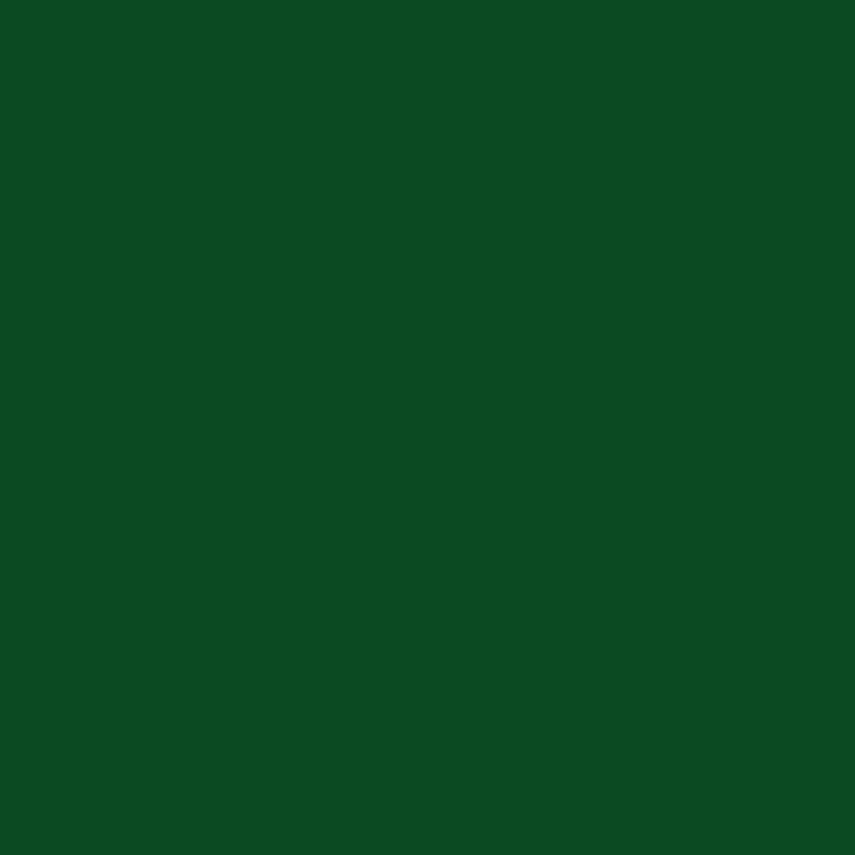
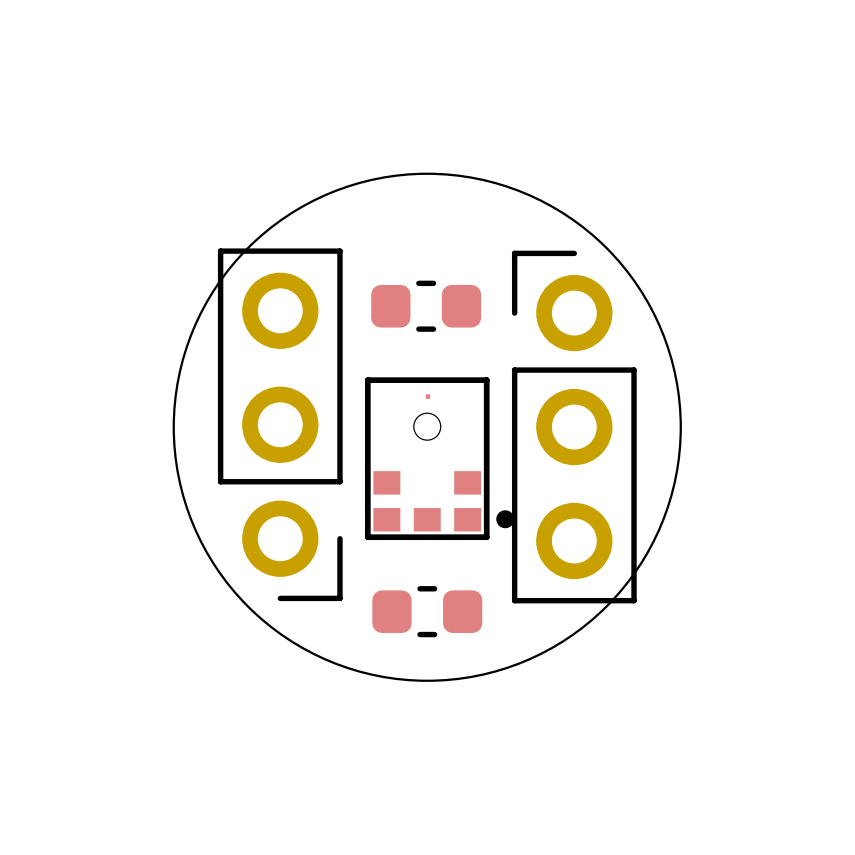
round board edge: none -> [172, 172, 682, 682]
part: none -> (426, 306)
part: none -> (280, 424)
part: none -> (574, 427)
part: none -> (439, 458)
part: none -> (427, 611)

